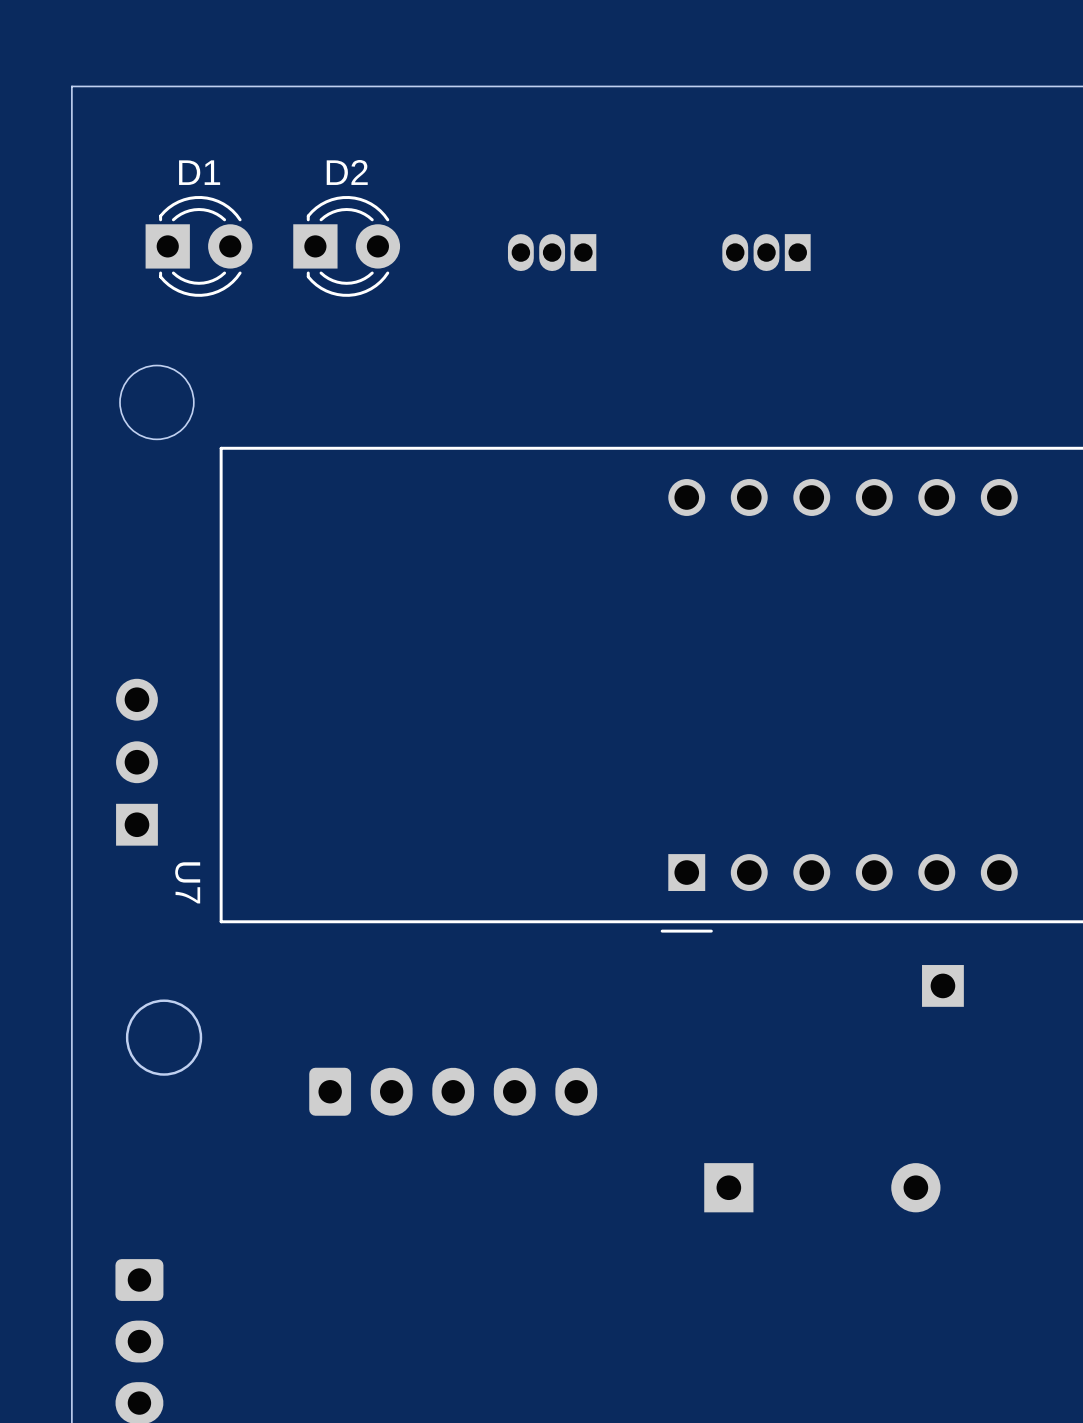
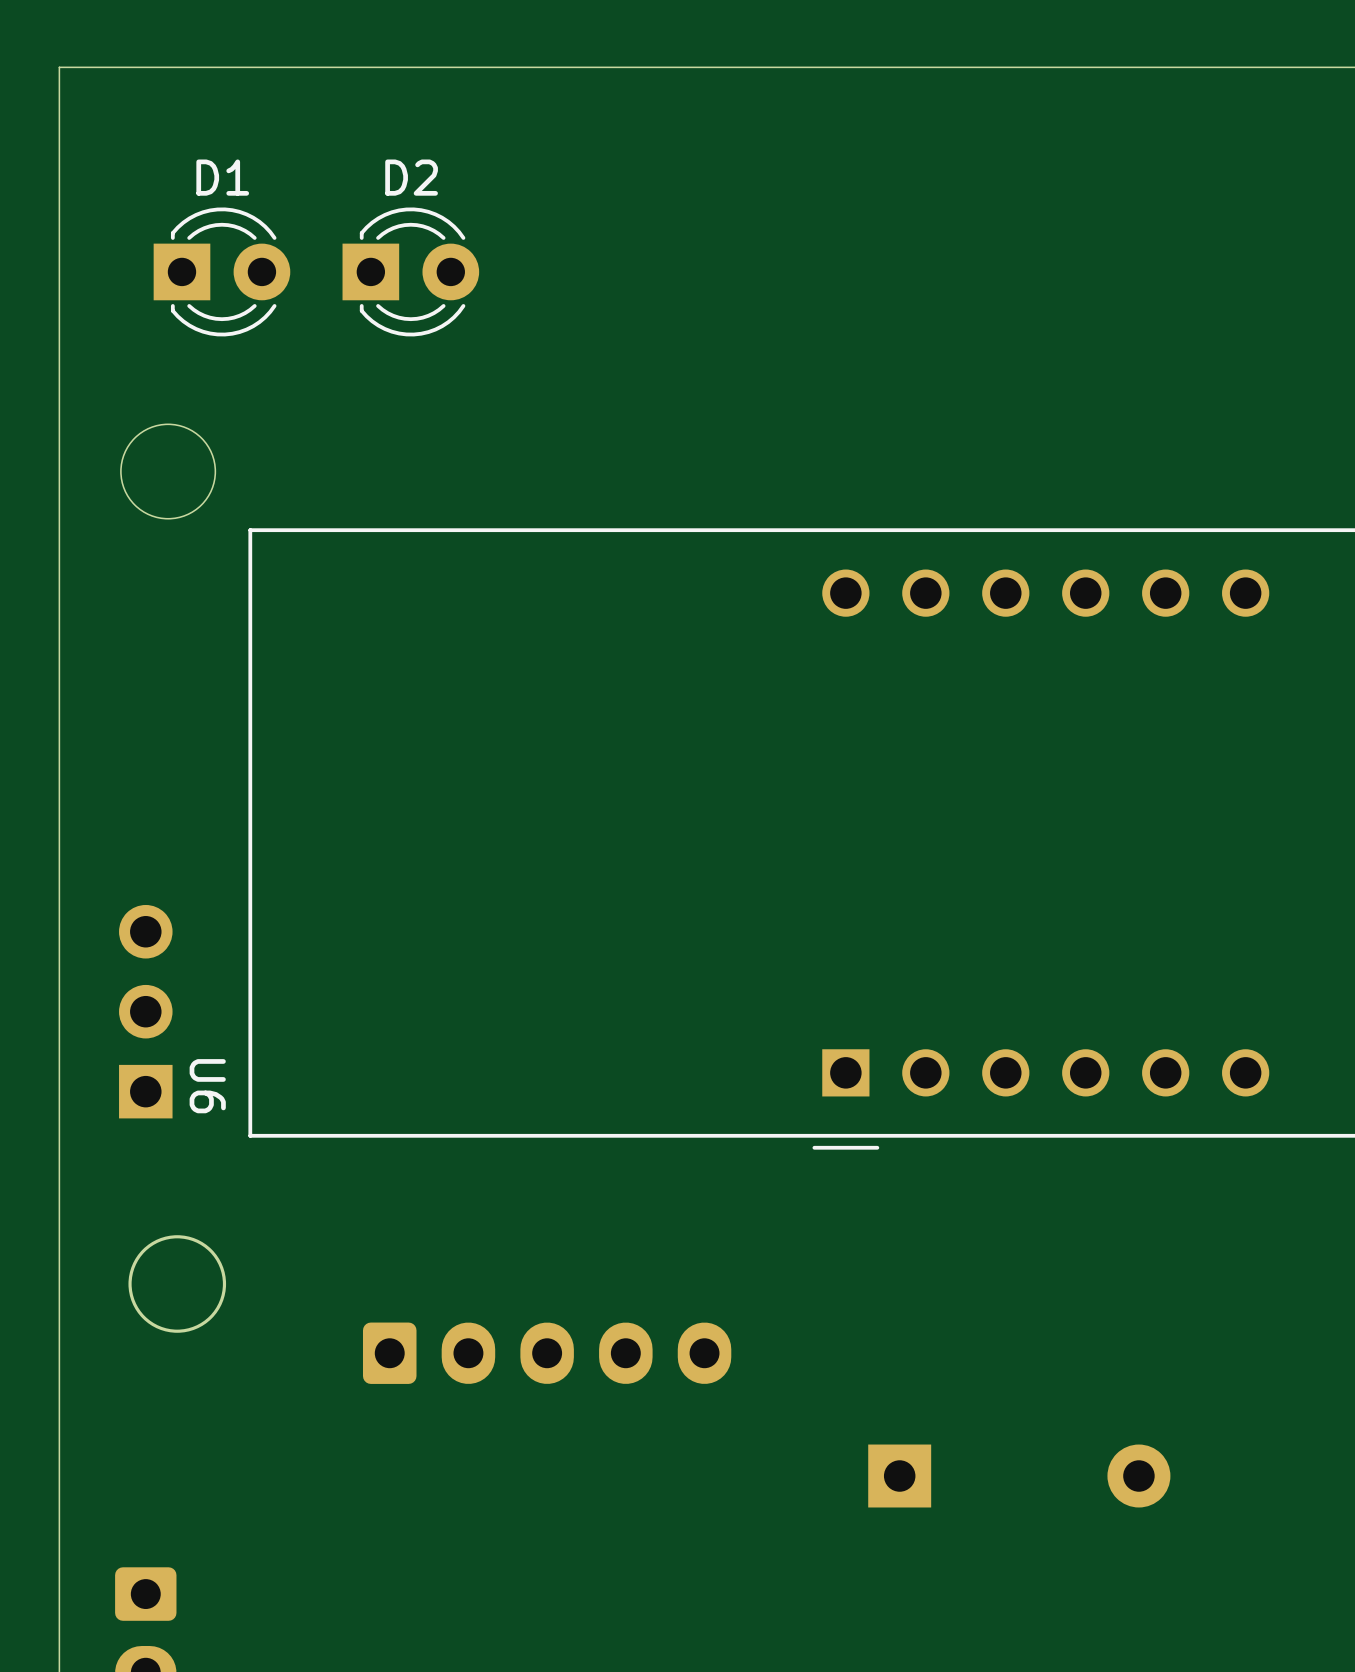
part: (552, 252) -> none
part: (766, 252) -> none
part position: (136, 762) -> (145, 1011)
U7 name: U7 (187, 882) -> U6 (207, 1086)
part: (942, 985) -> none

